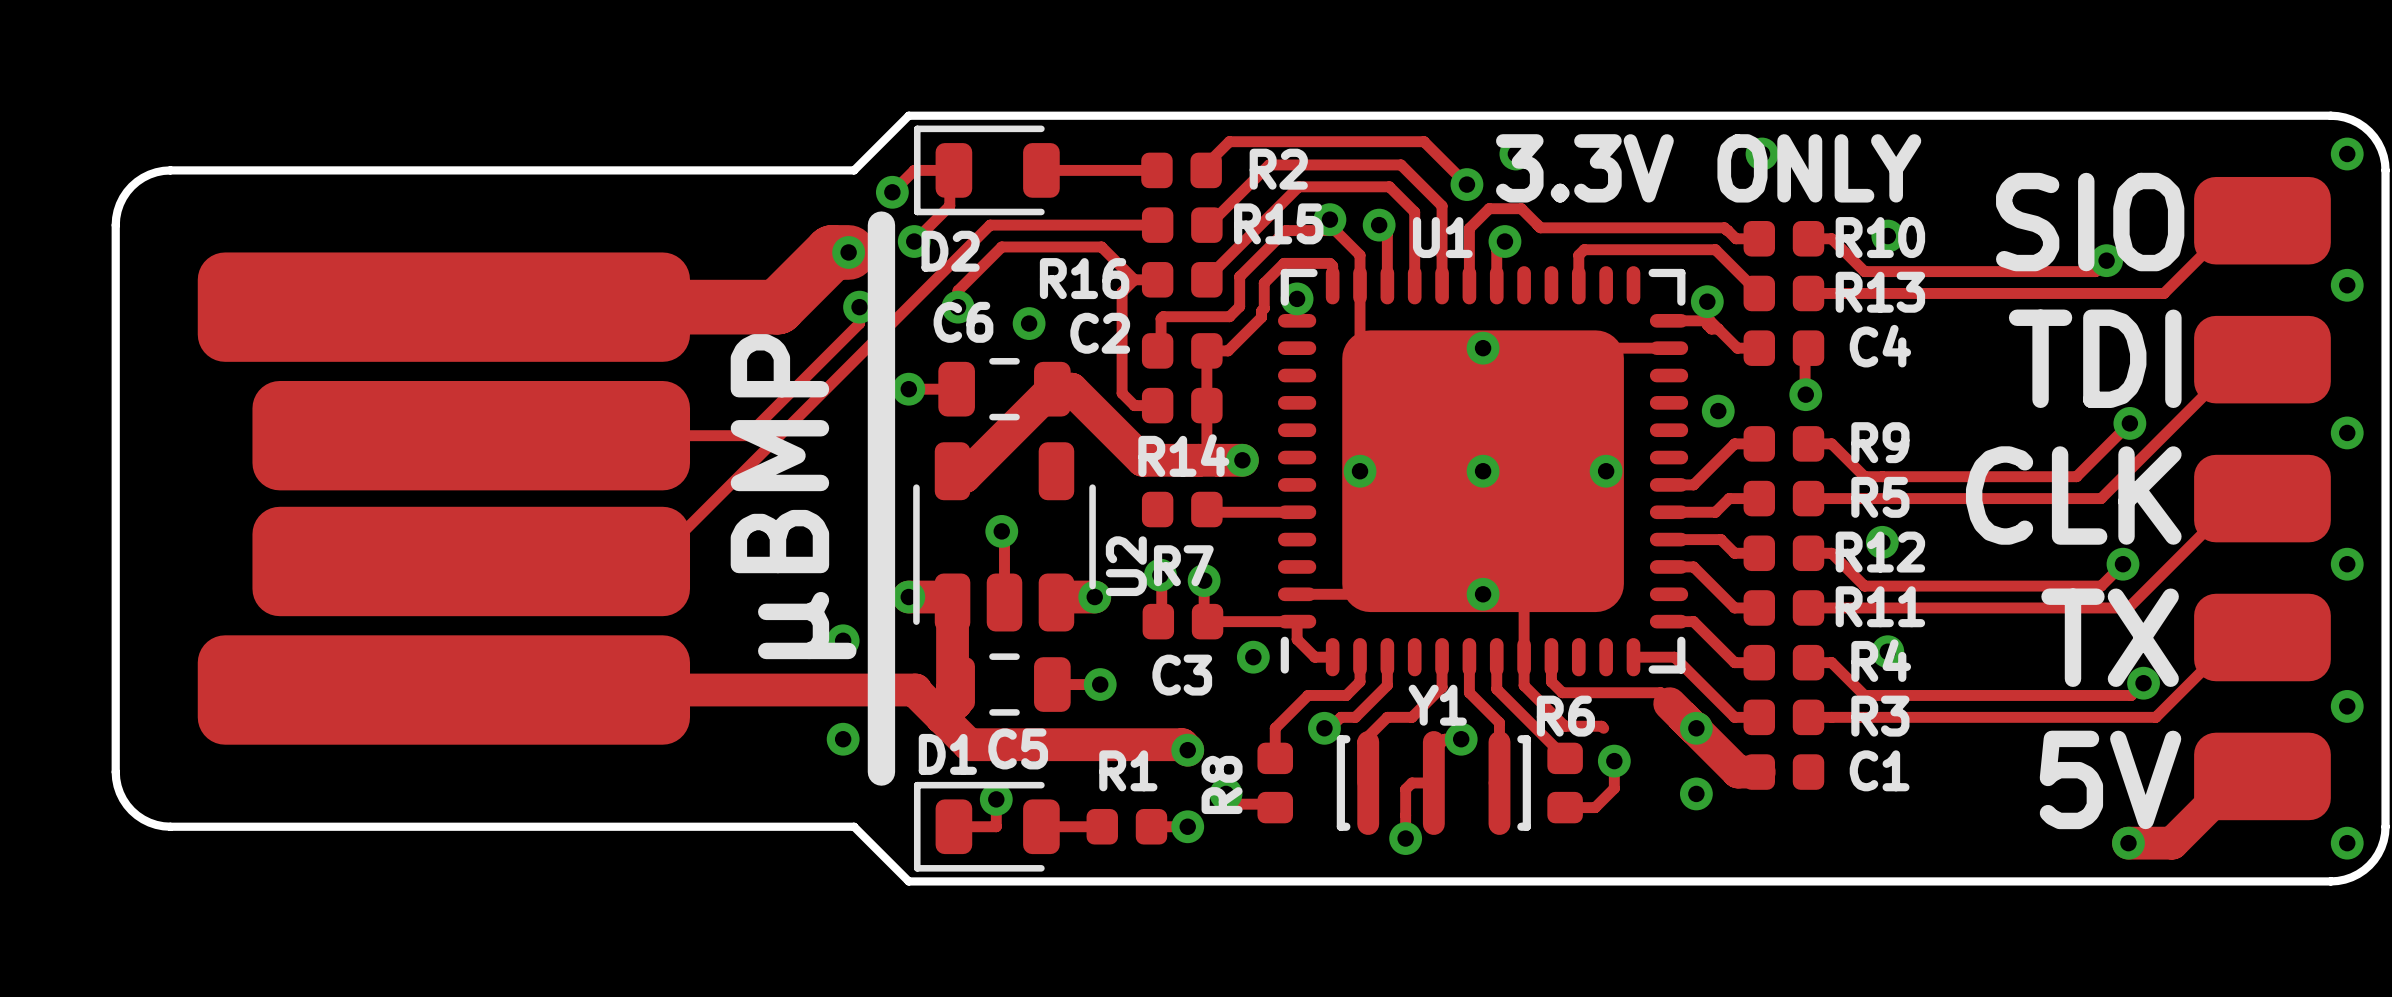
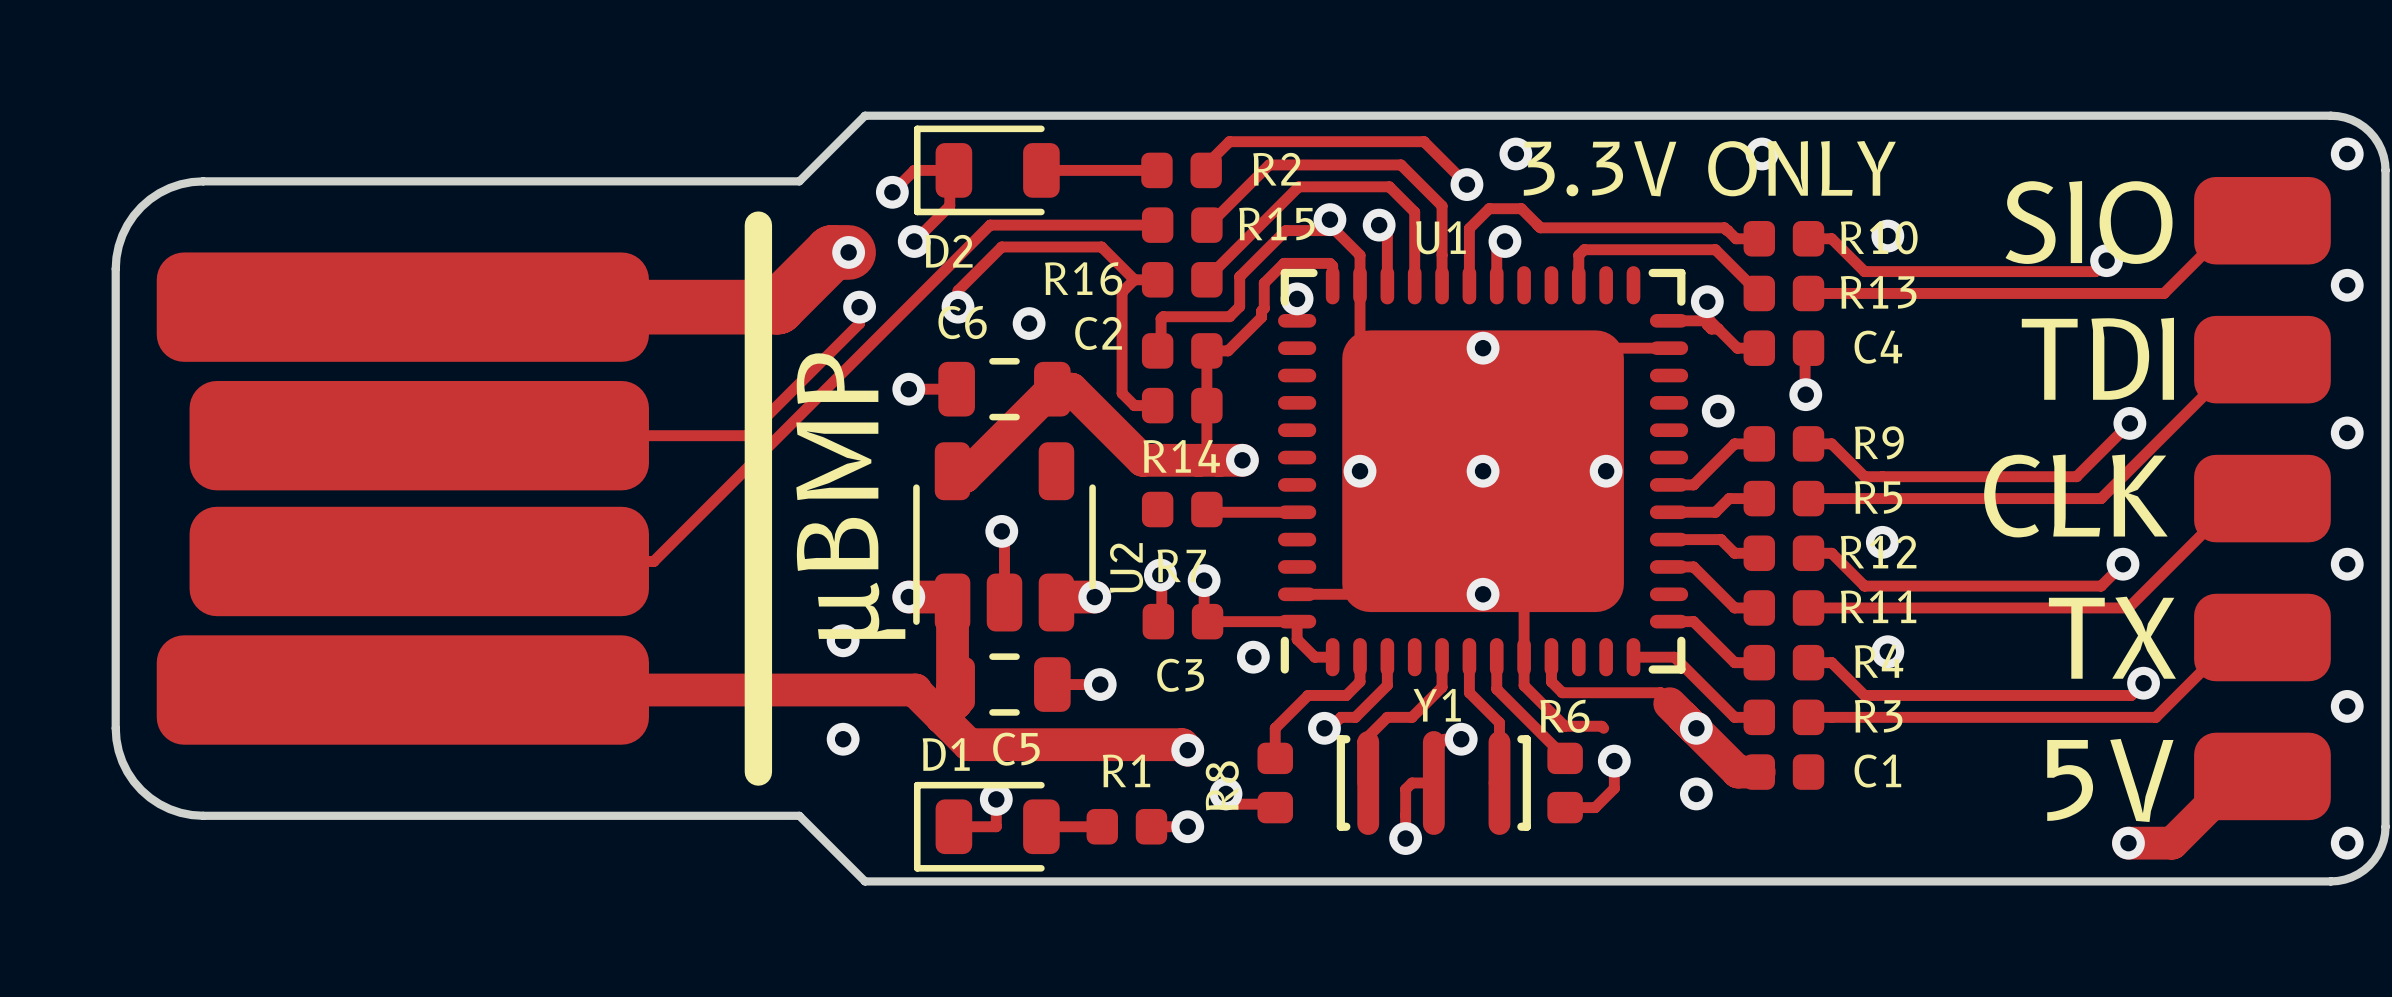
board edge: (908, 115) (854, 170) (163, 170) (149, 174) (137, 181) (127, 191) (119, 204) (115, 225) (115, 268) -> (908, 115) (865, 115) (799, 181) (191, 182) (169, 188) (141, 206) (122, 235) (115, 268)
line: (881, 225) (881, 772) -> (758, 225) (758, 772)
part footprint: [197, 252, 691, 745] -> [156, 252, 649, 745]
text position: µBMP (793, 496) -> µBMP (850, 496)
board edge: (115, 728) (115, 772) (119, 792) (127, 805) (137, 815) (149, 822) (163, 826) (854, 826) (908, 881) -> (115, 728) (122, 761) (141, 790) (169, 809) (191, 815) (799, 815) (865, 881) (908, 881)

